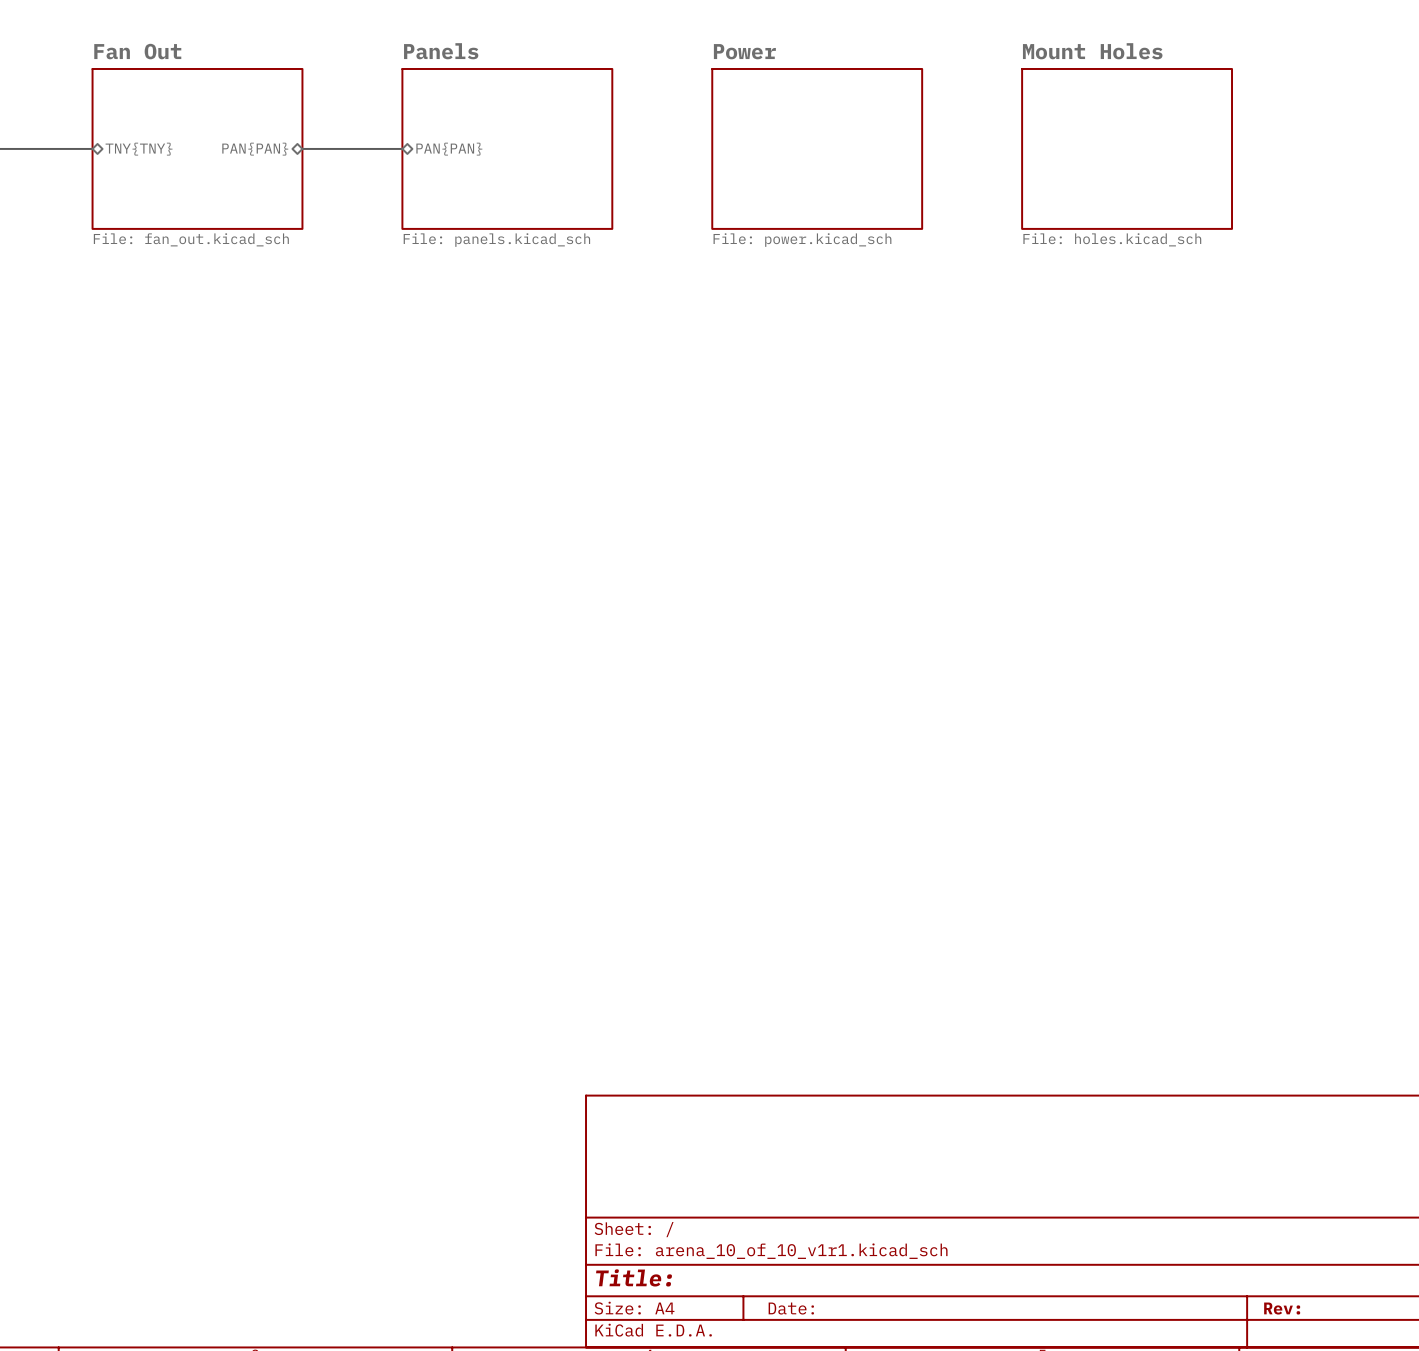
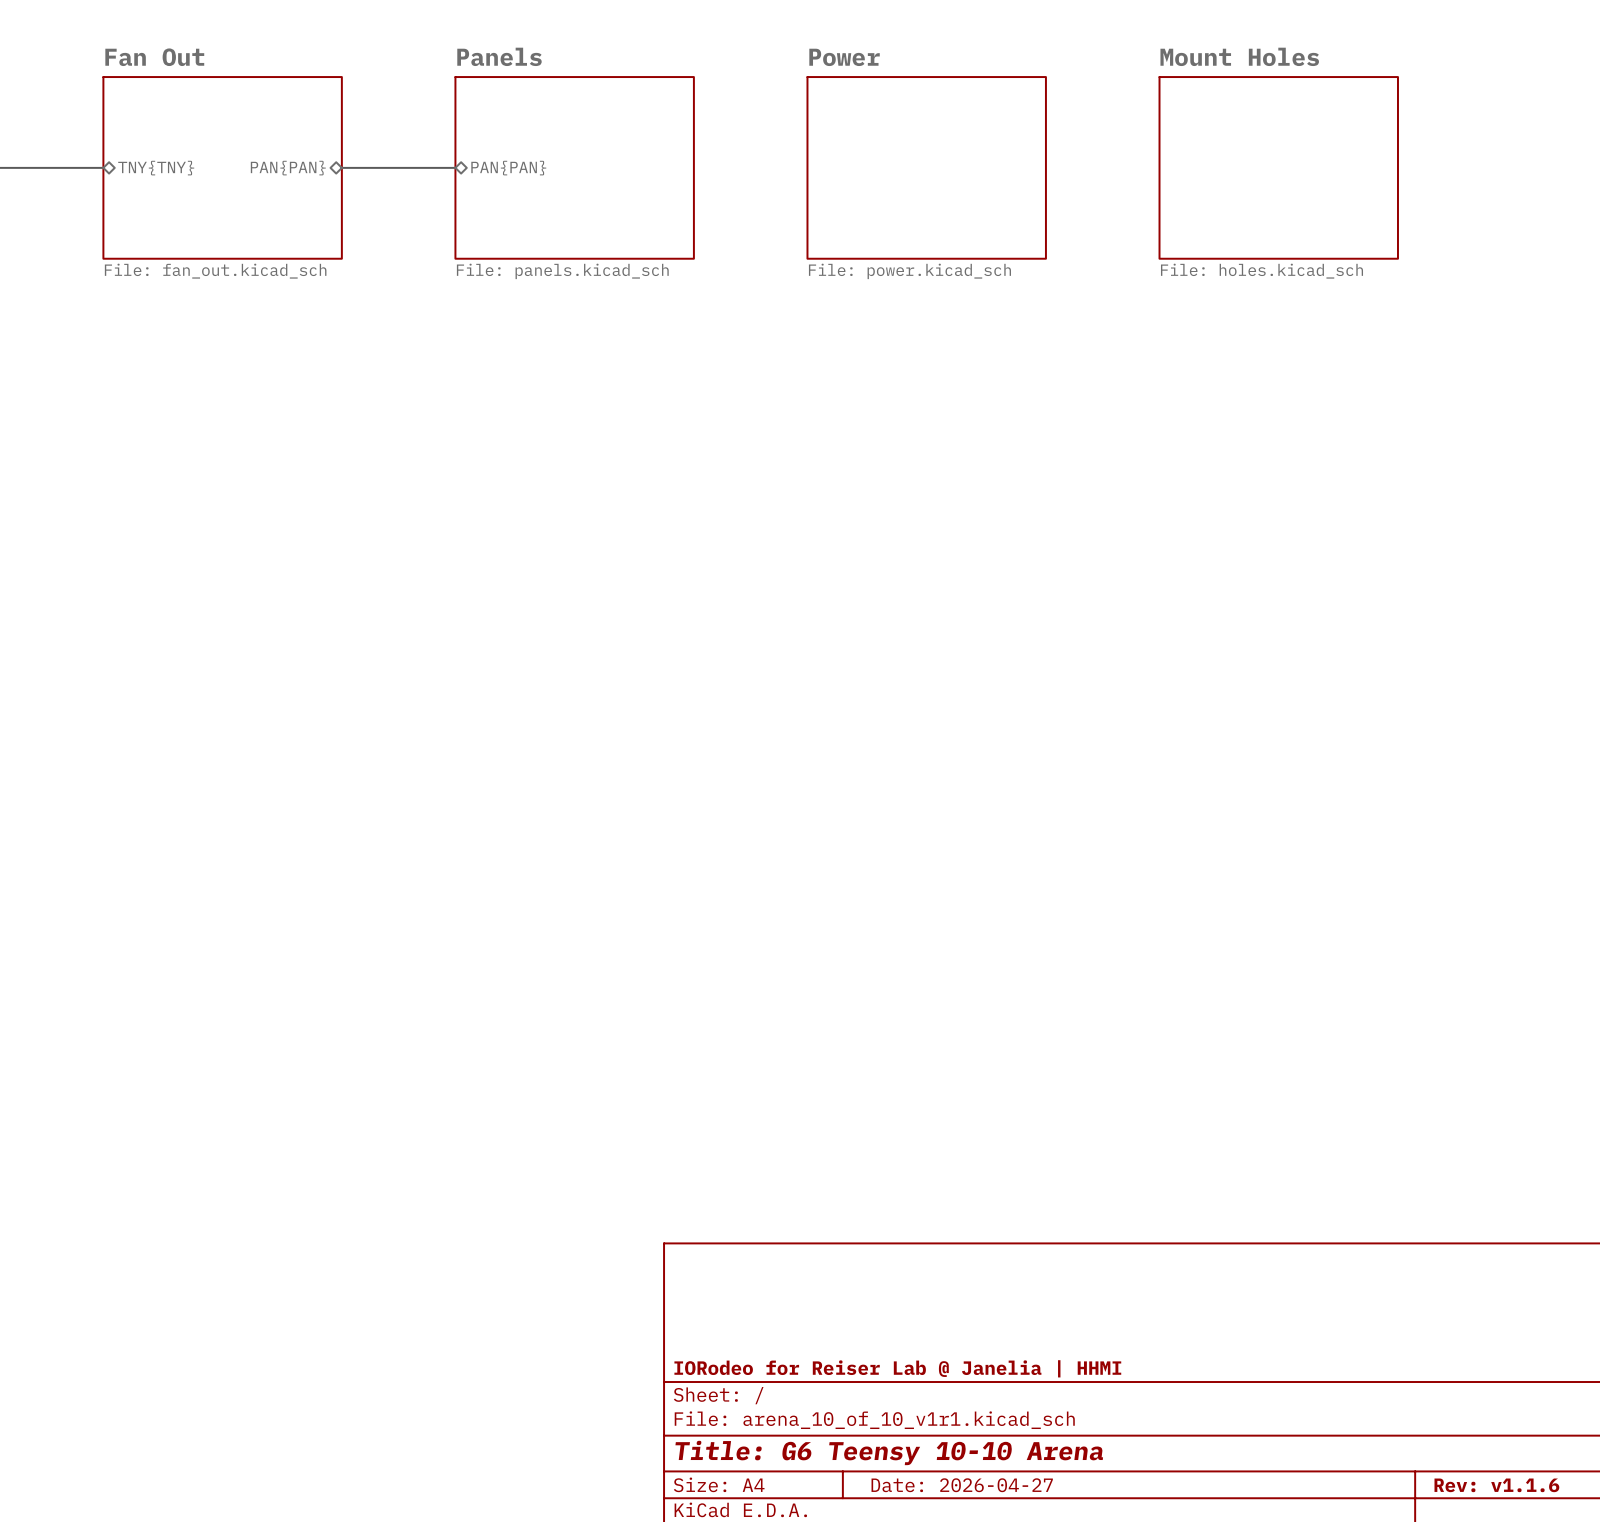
title block: none -> IORodeo for Reiser Lab @ Janelia | HHMI (897, 1368)
title block: Title: (634, 1277) -> Title: G6 Teensy 10-10 Arena (889, 1452)
title block: Date: (791, 1308) -> Date: 2026-04-27 (962, 1485)
title block: Rev: (1282, 1308) -> Rev: v1.1.6 (1496, 1485)

